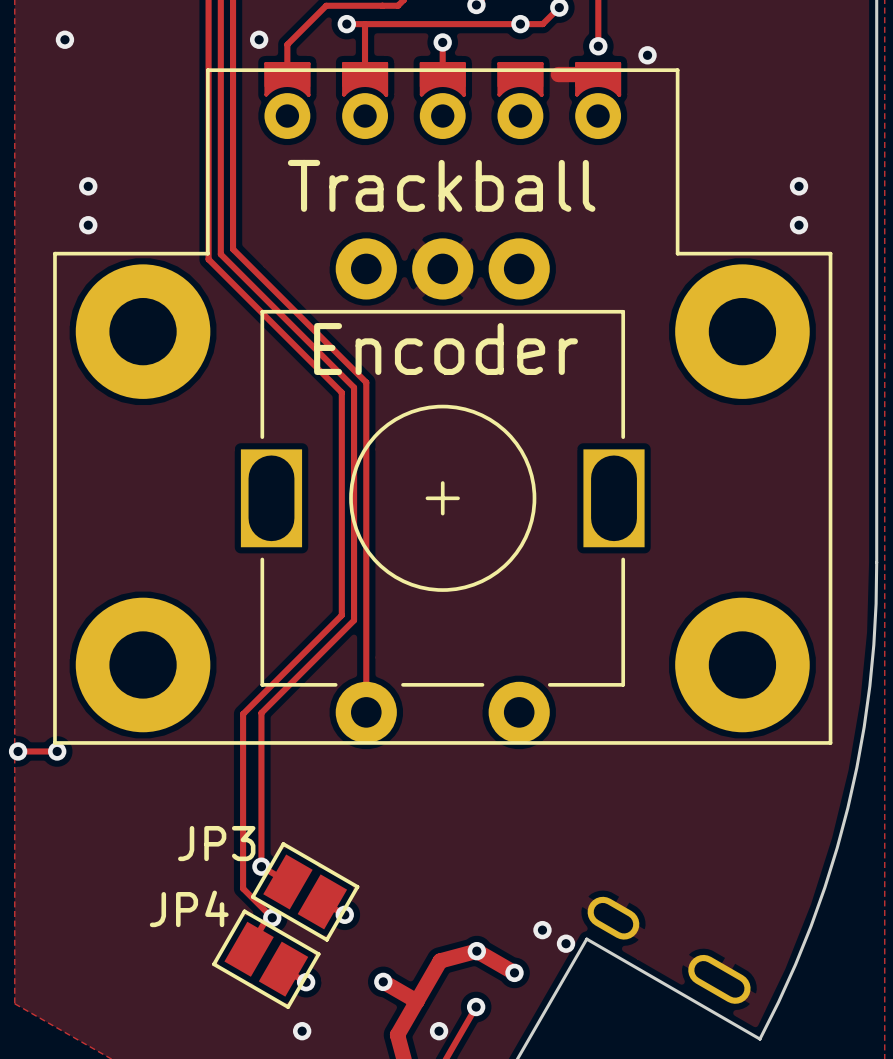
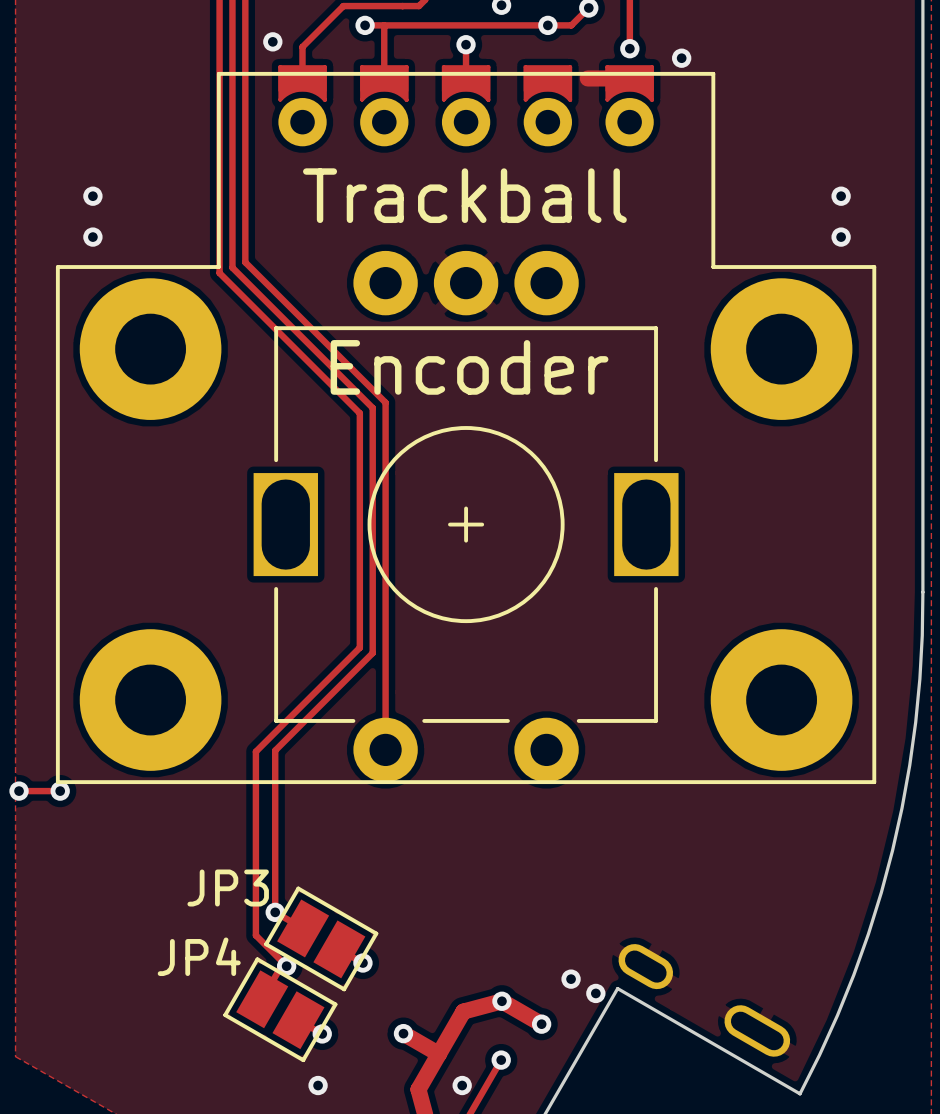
via: (64, 39) -> none

